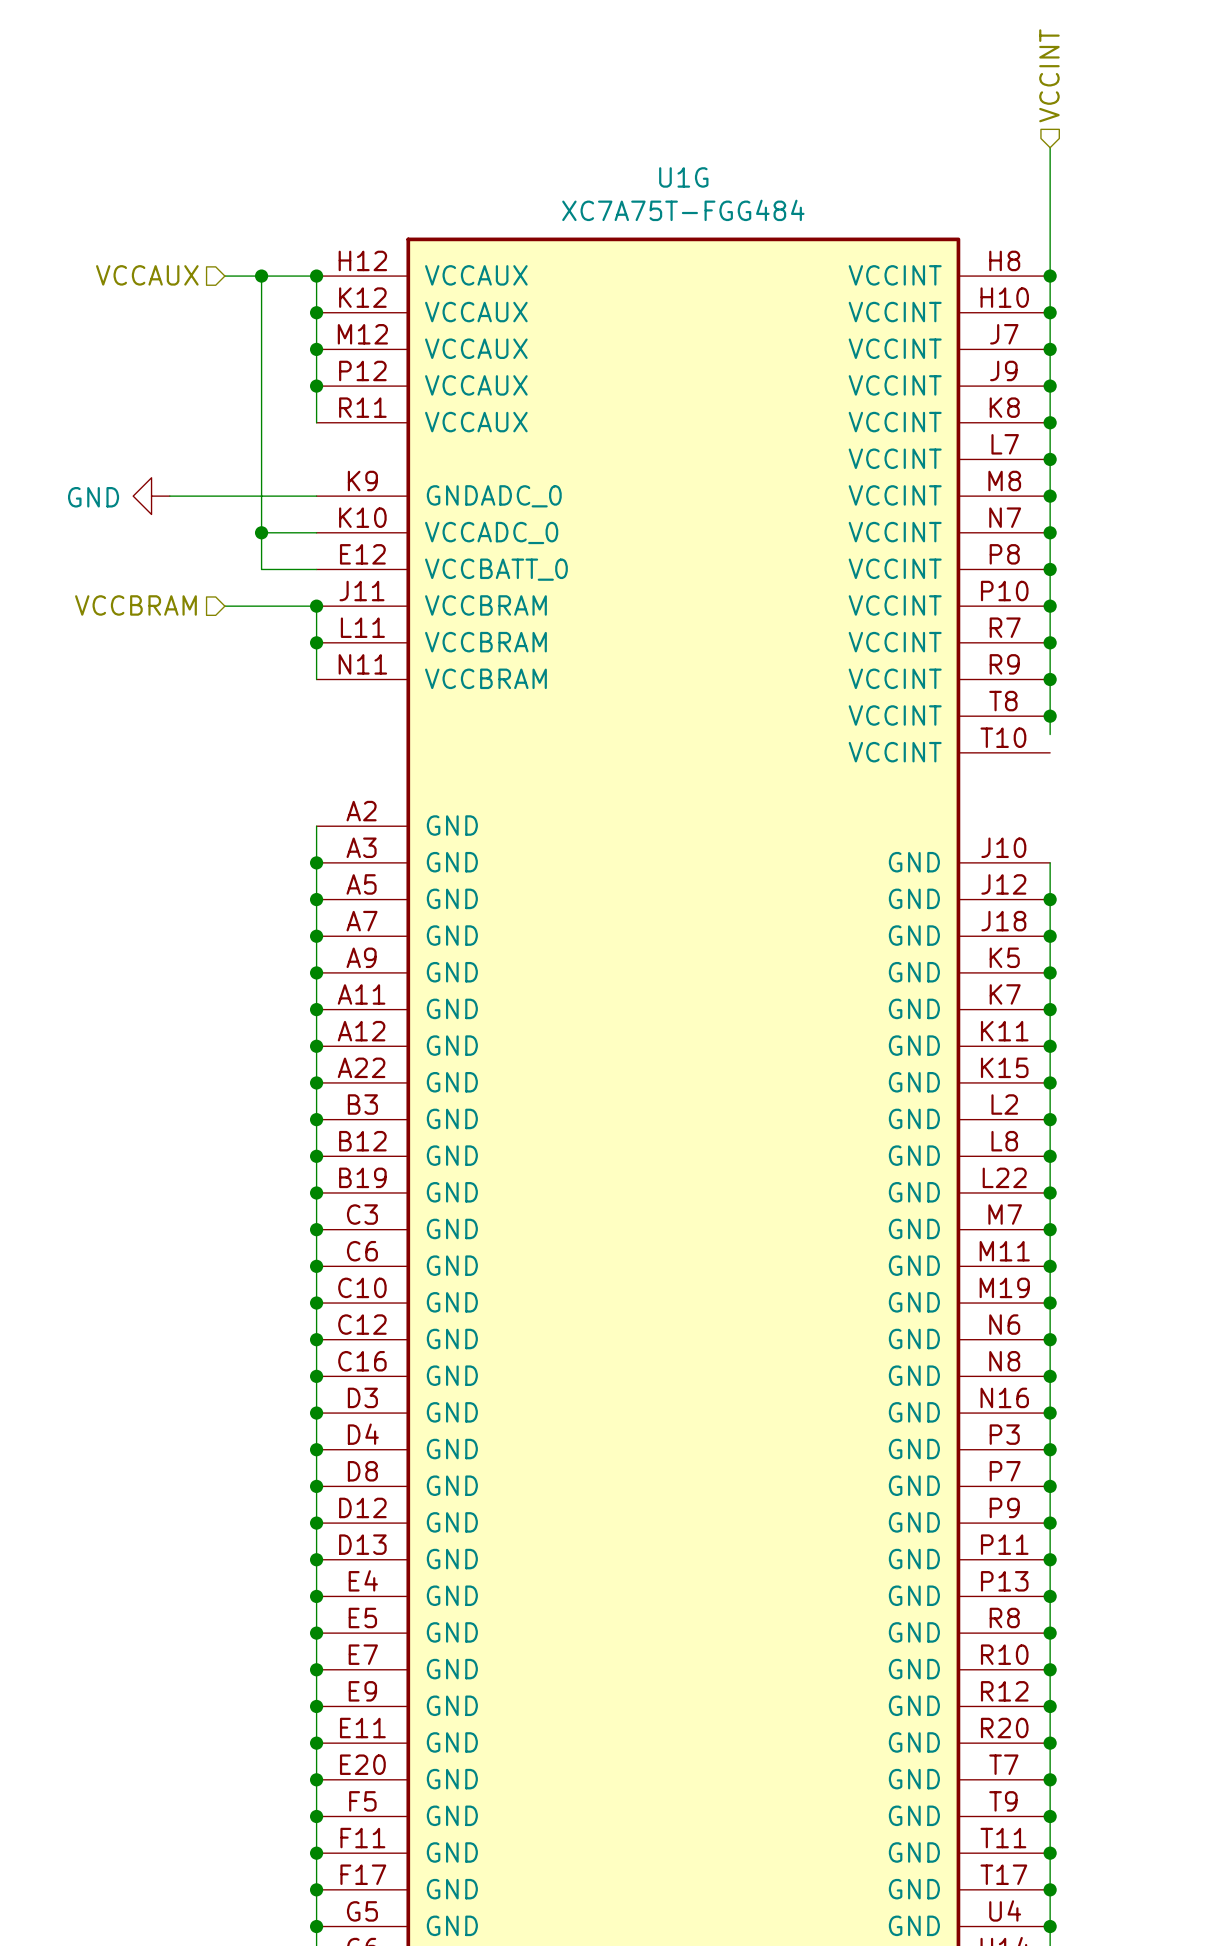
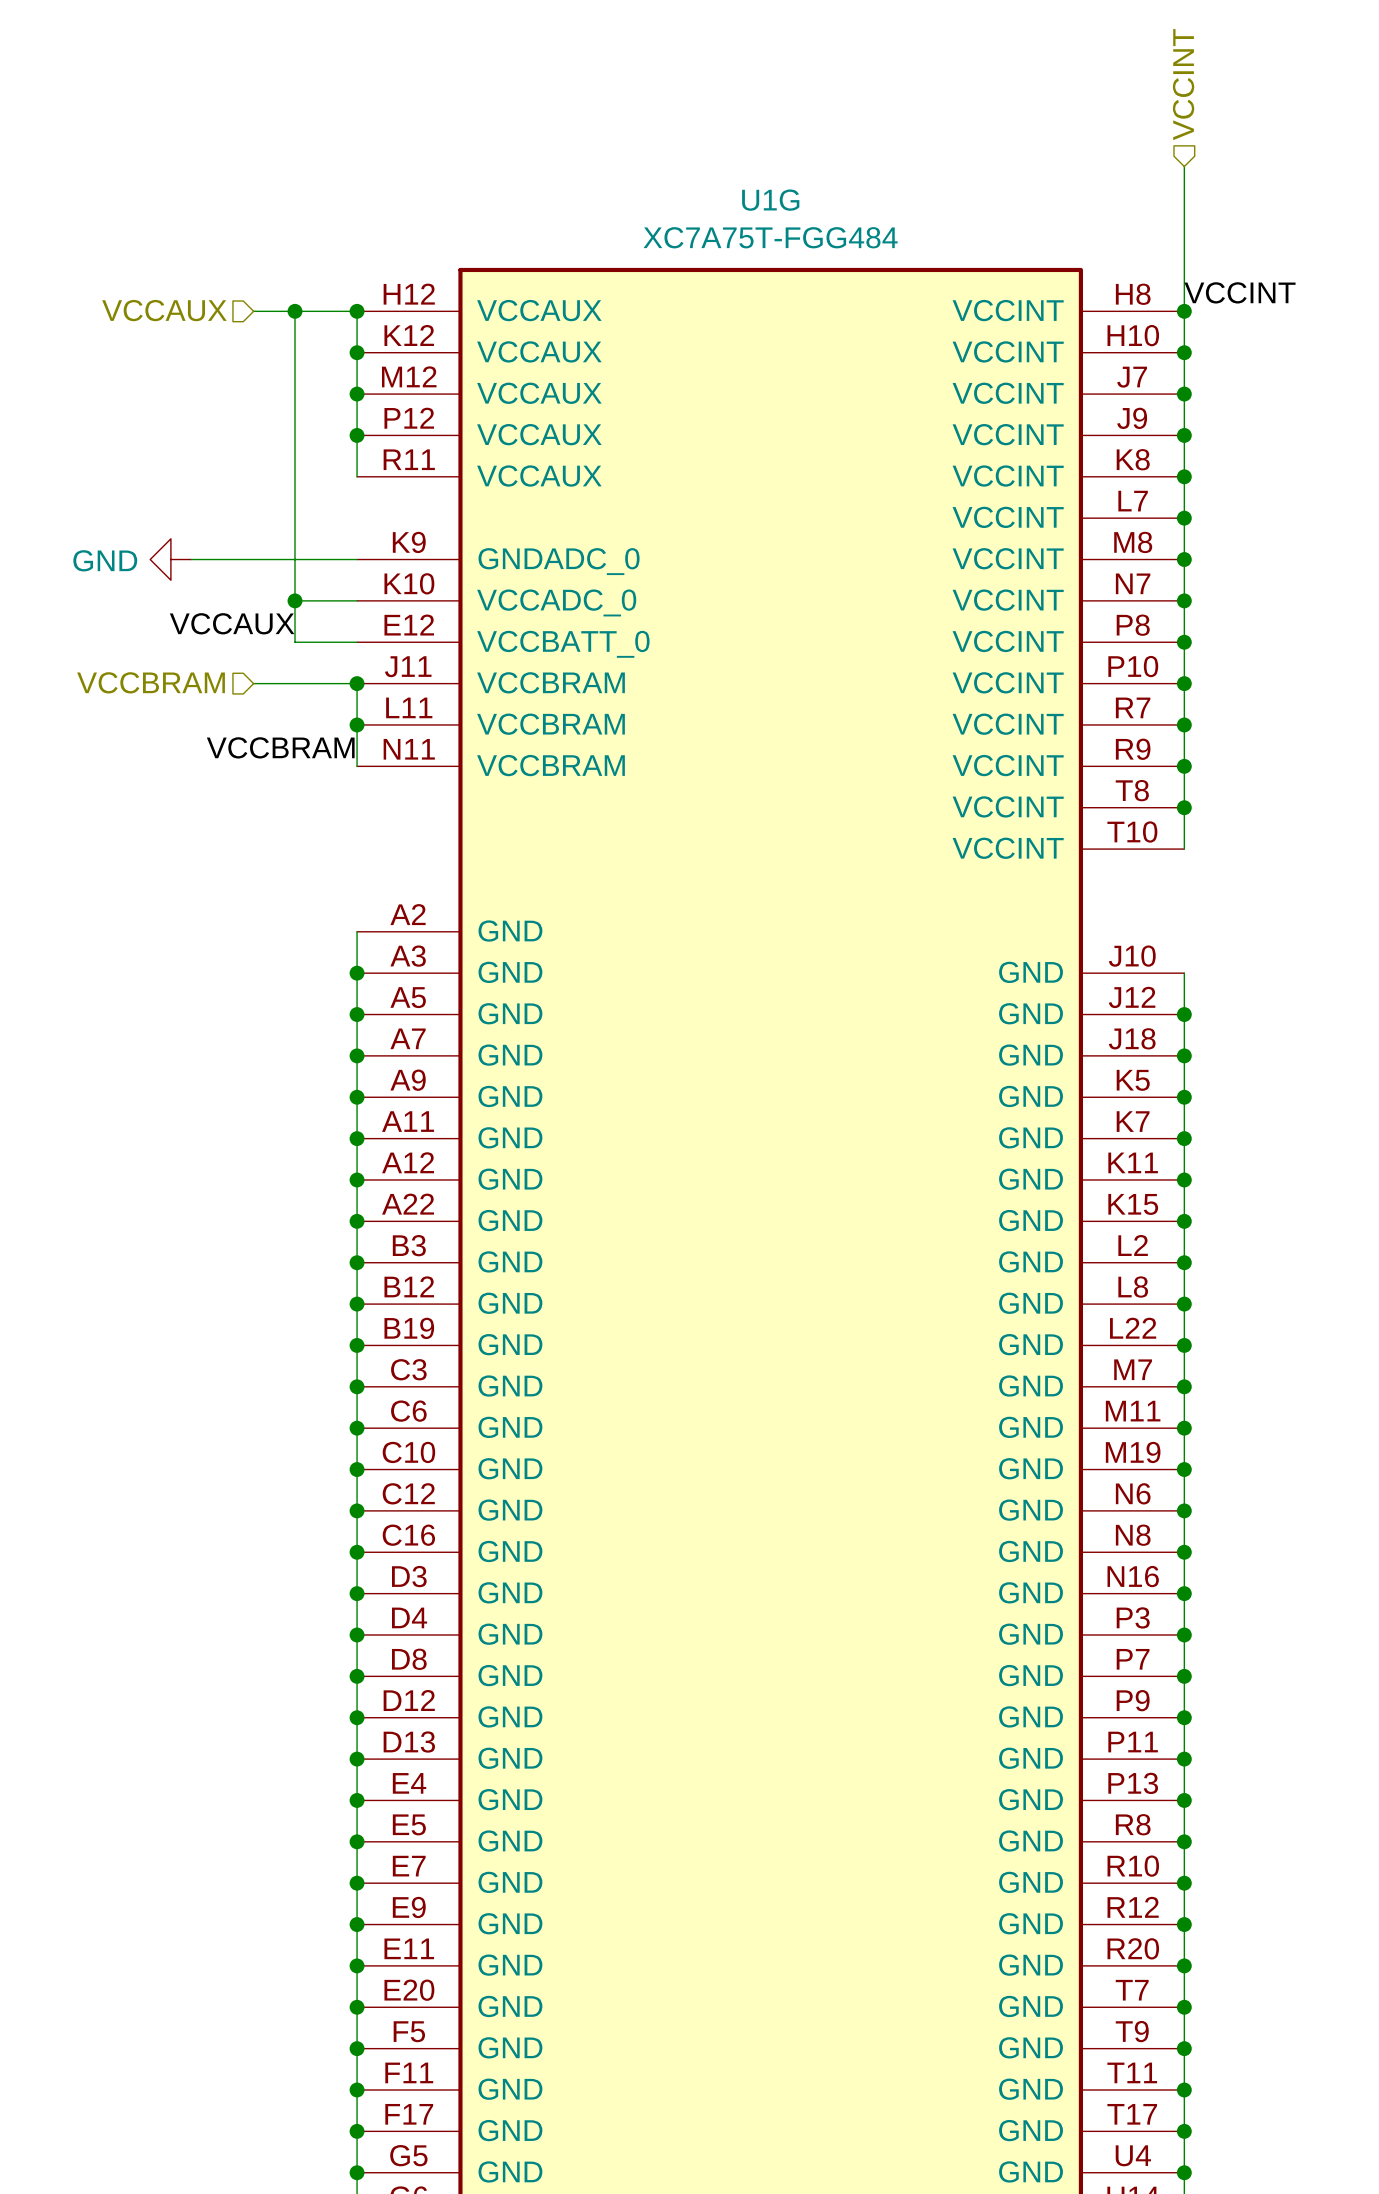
label: none -> VCCINT (1240, 292)
label: none -> VCCAUX (232, 623)
label: none -> VCCBRAM (280, 747)
wire: none -> (1184, 828) (1184, 849)

